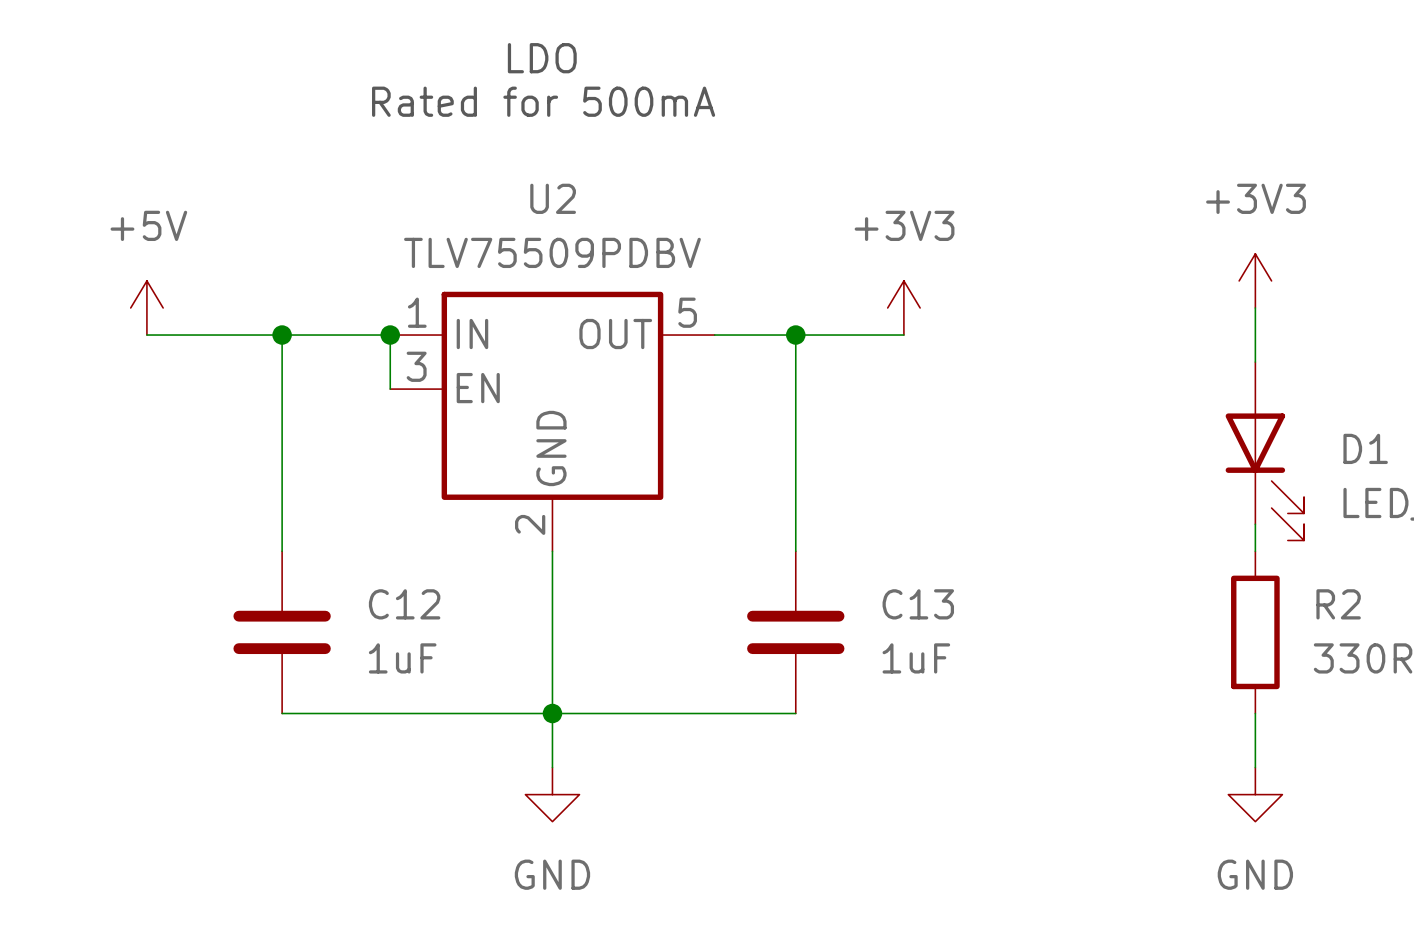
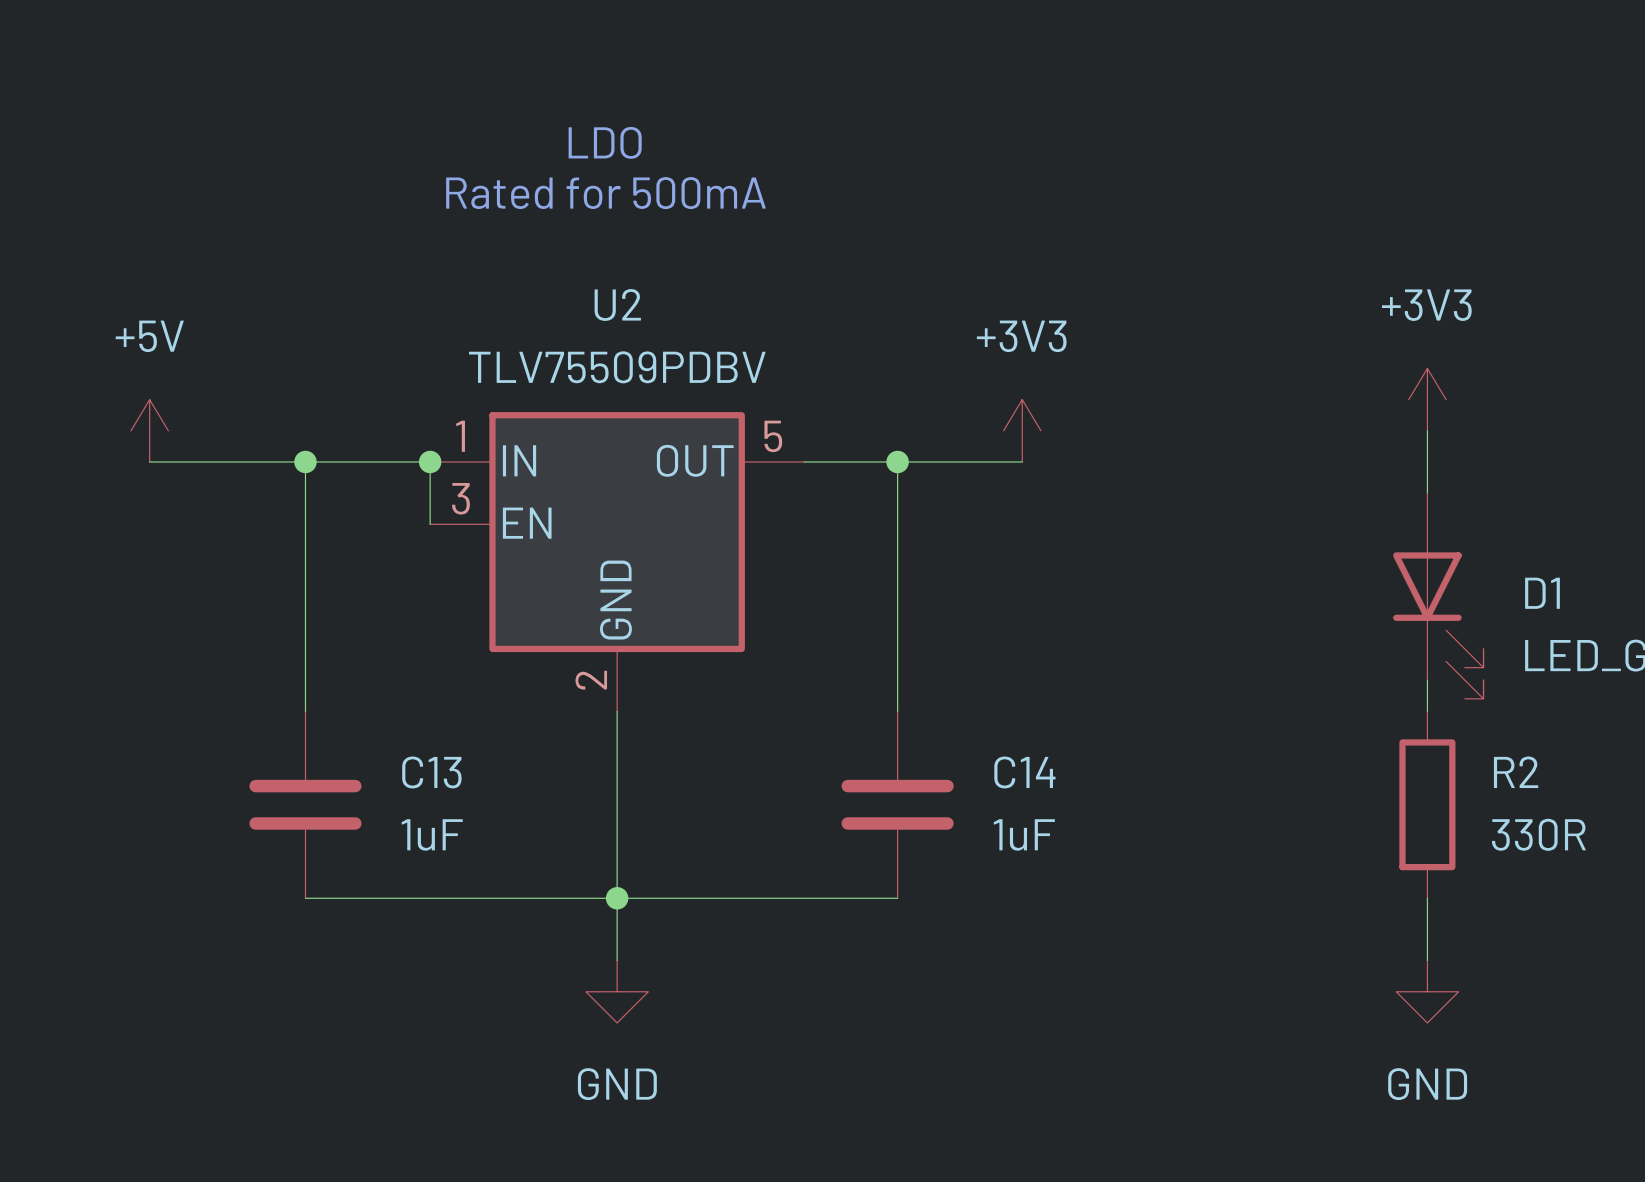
C12 name: C12 (404, 604) -> C13 (431, 772)
C13 name: C13 (918, 604) -> C14 (1024, 772)

